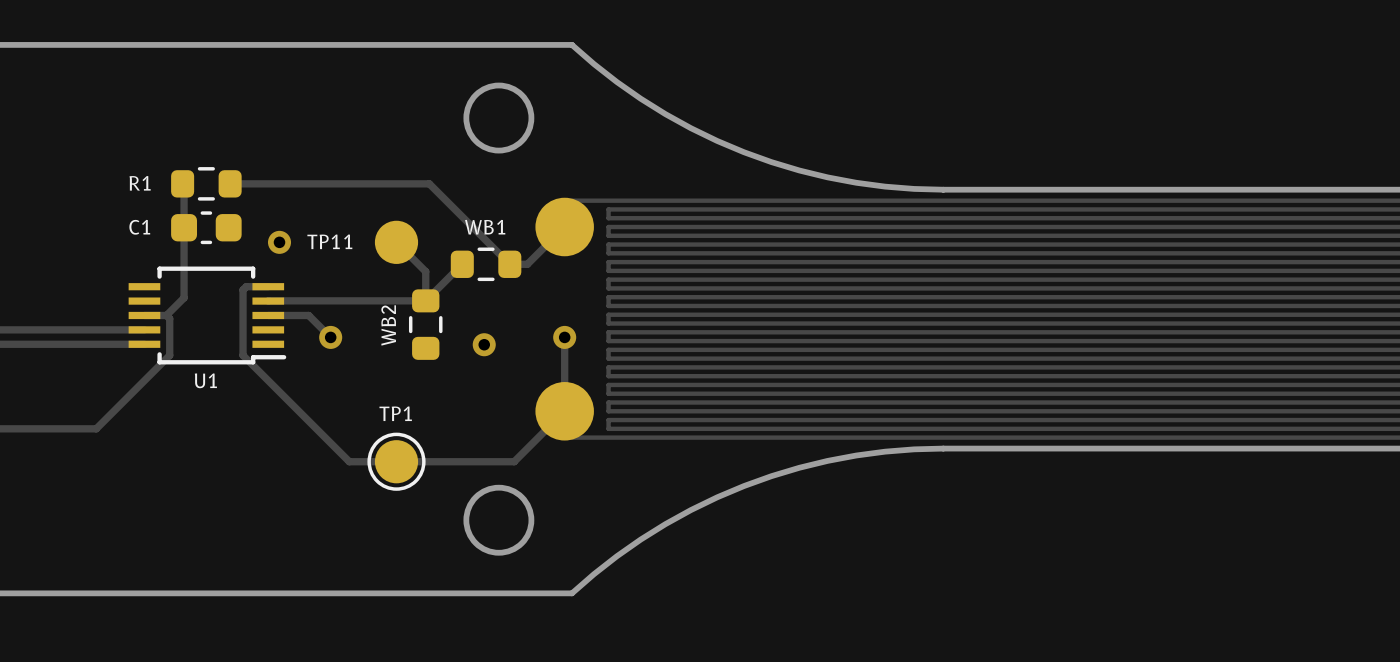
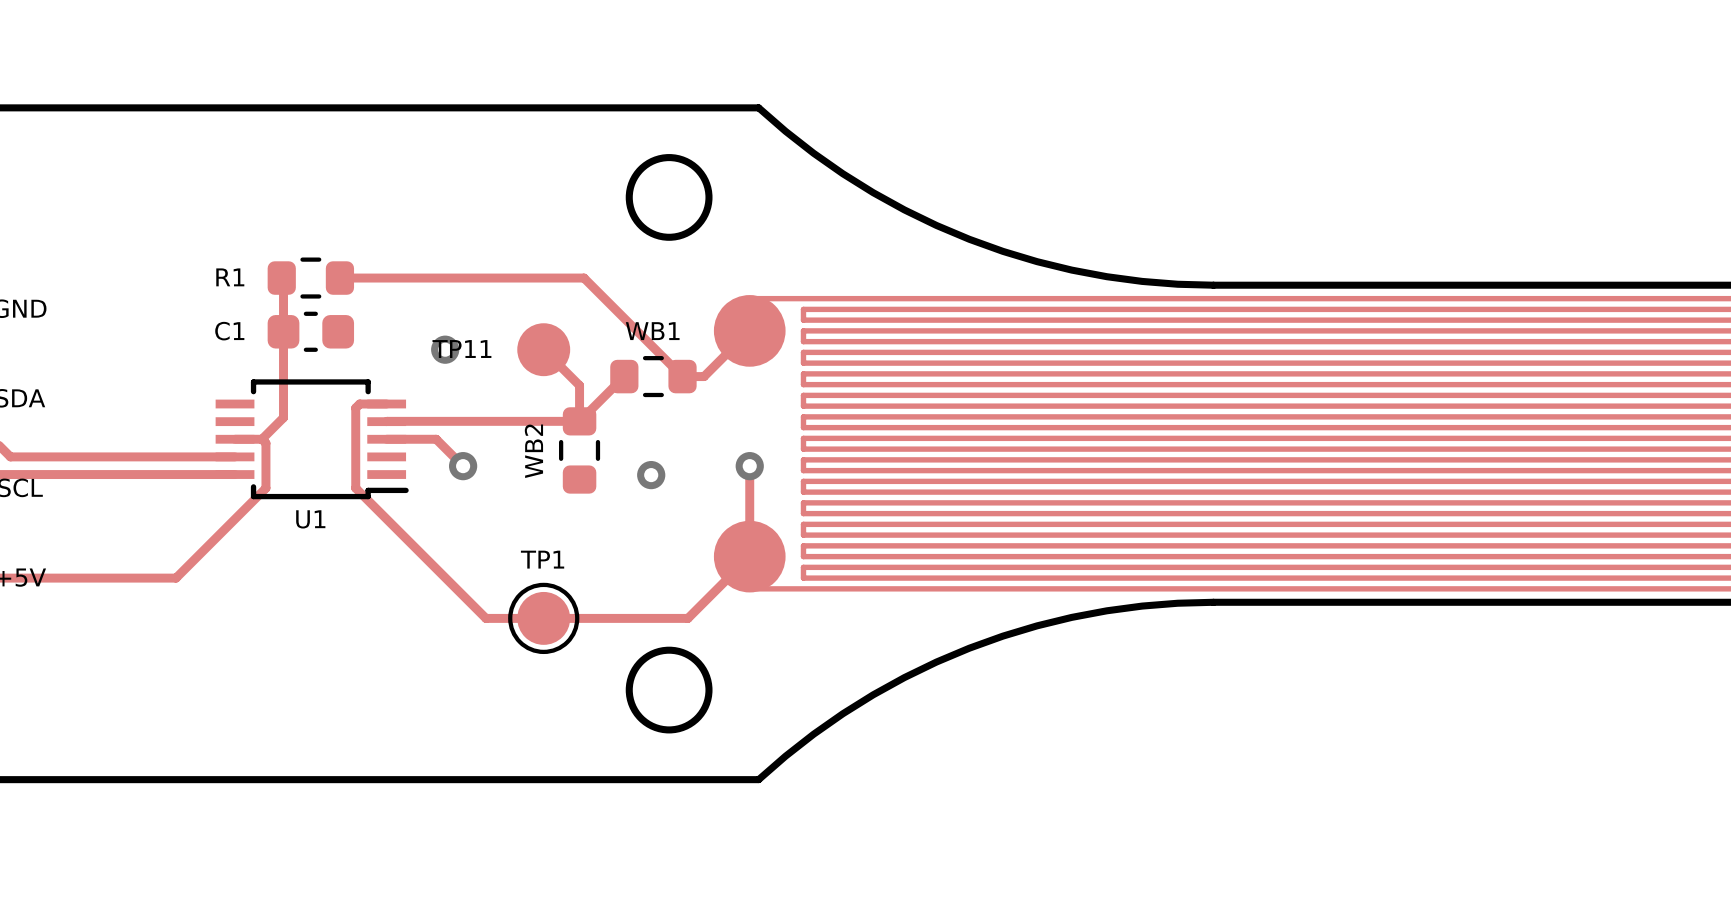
via position: (279, 242) -> (445, 349)

